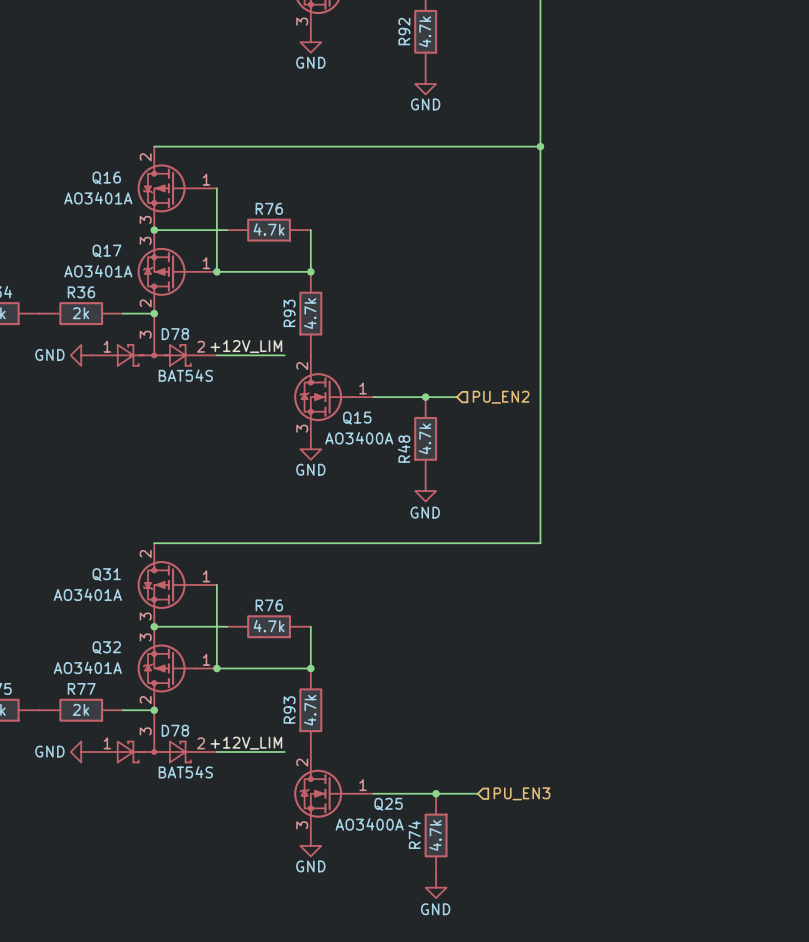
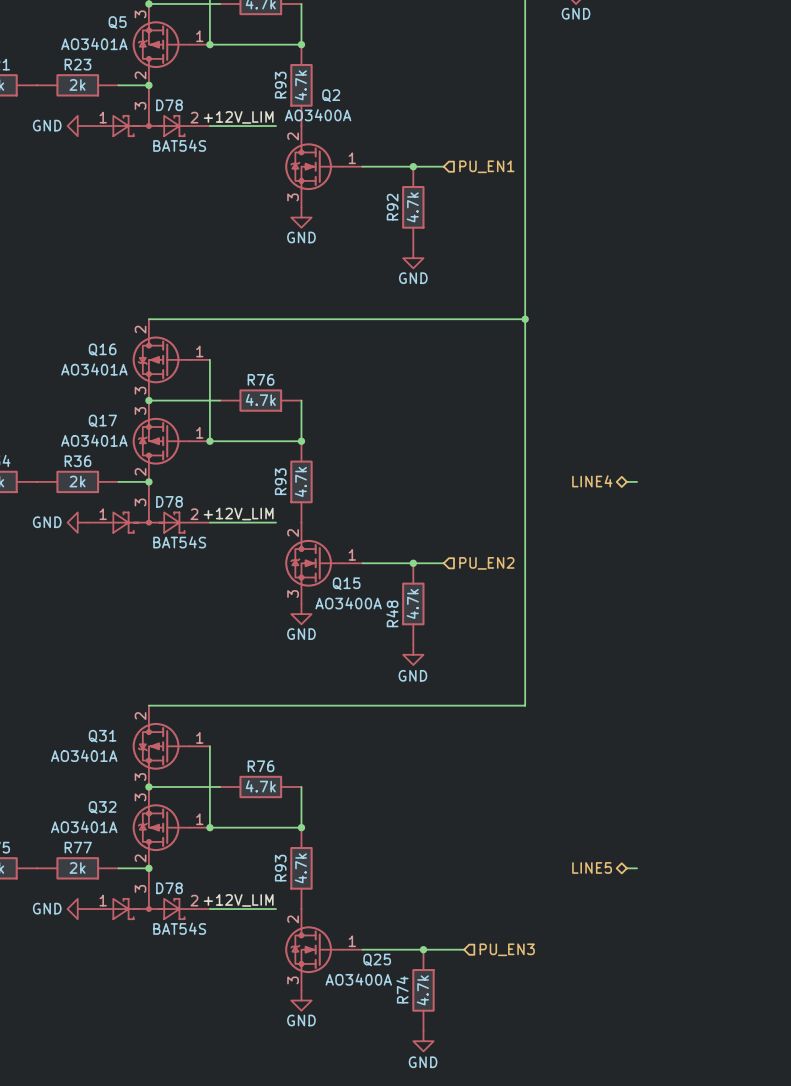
hierarchical label: none -> LINE4 (592, 481)
wire: none -> (626, 481) (637, 481)
hierarchical label: none -> LINE5 (592, 867)
wire: none -> (626, 868) (637, 868)

